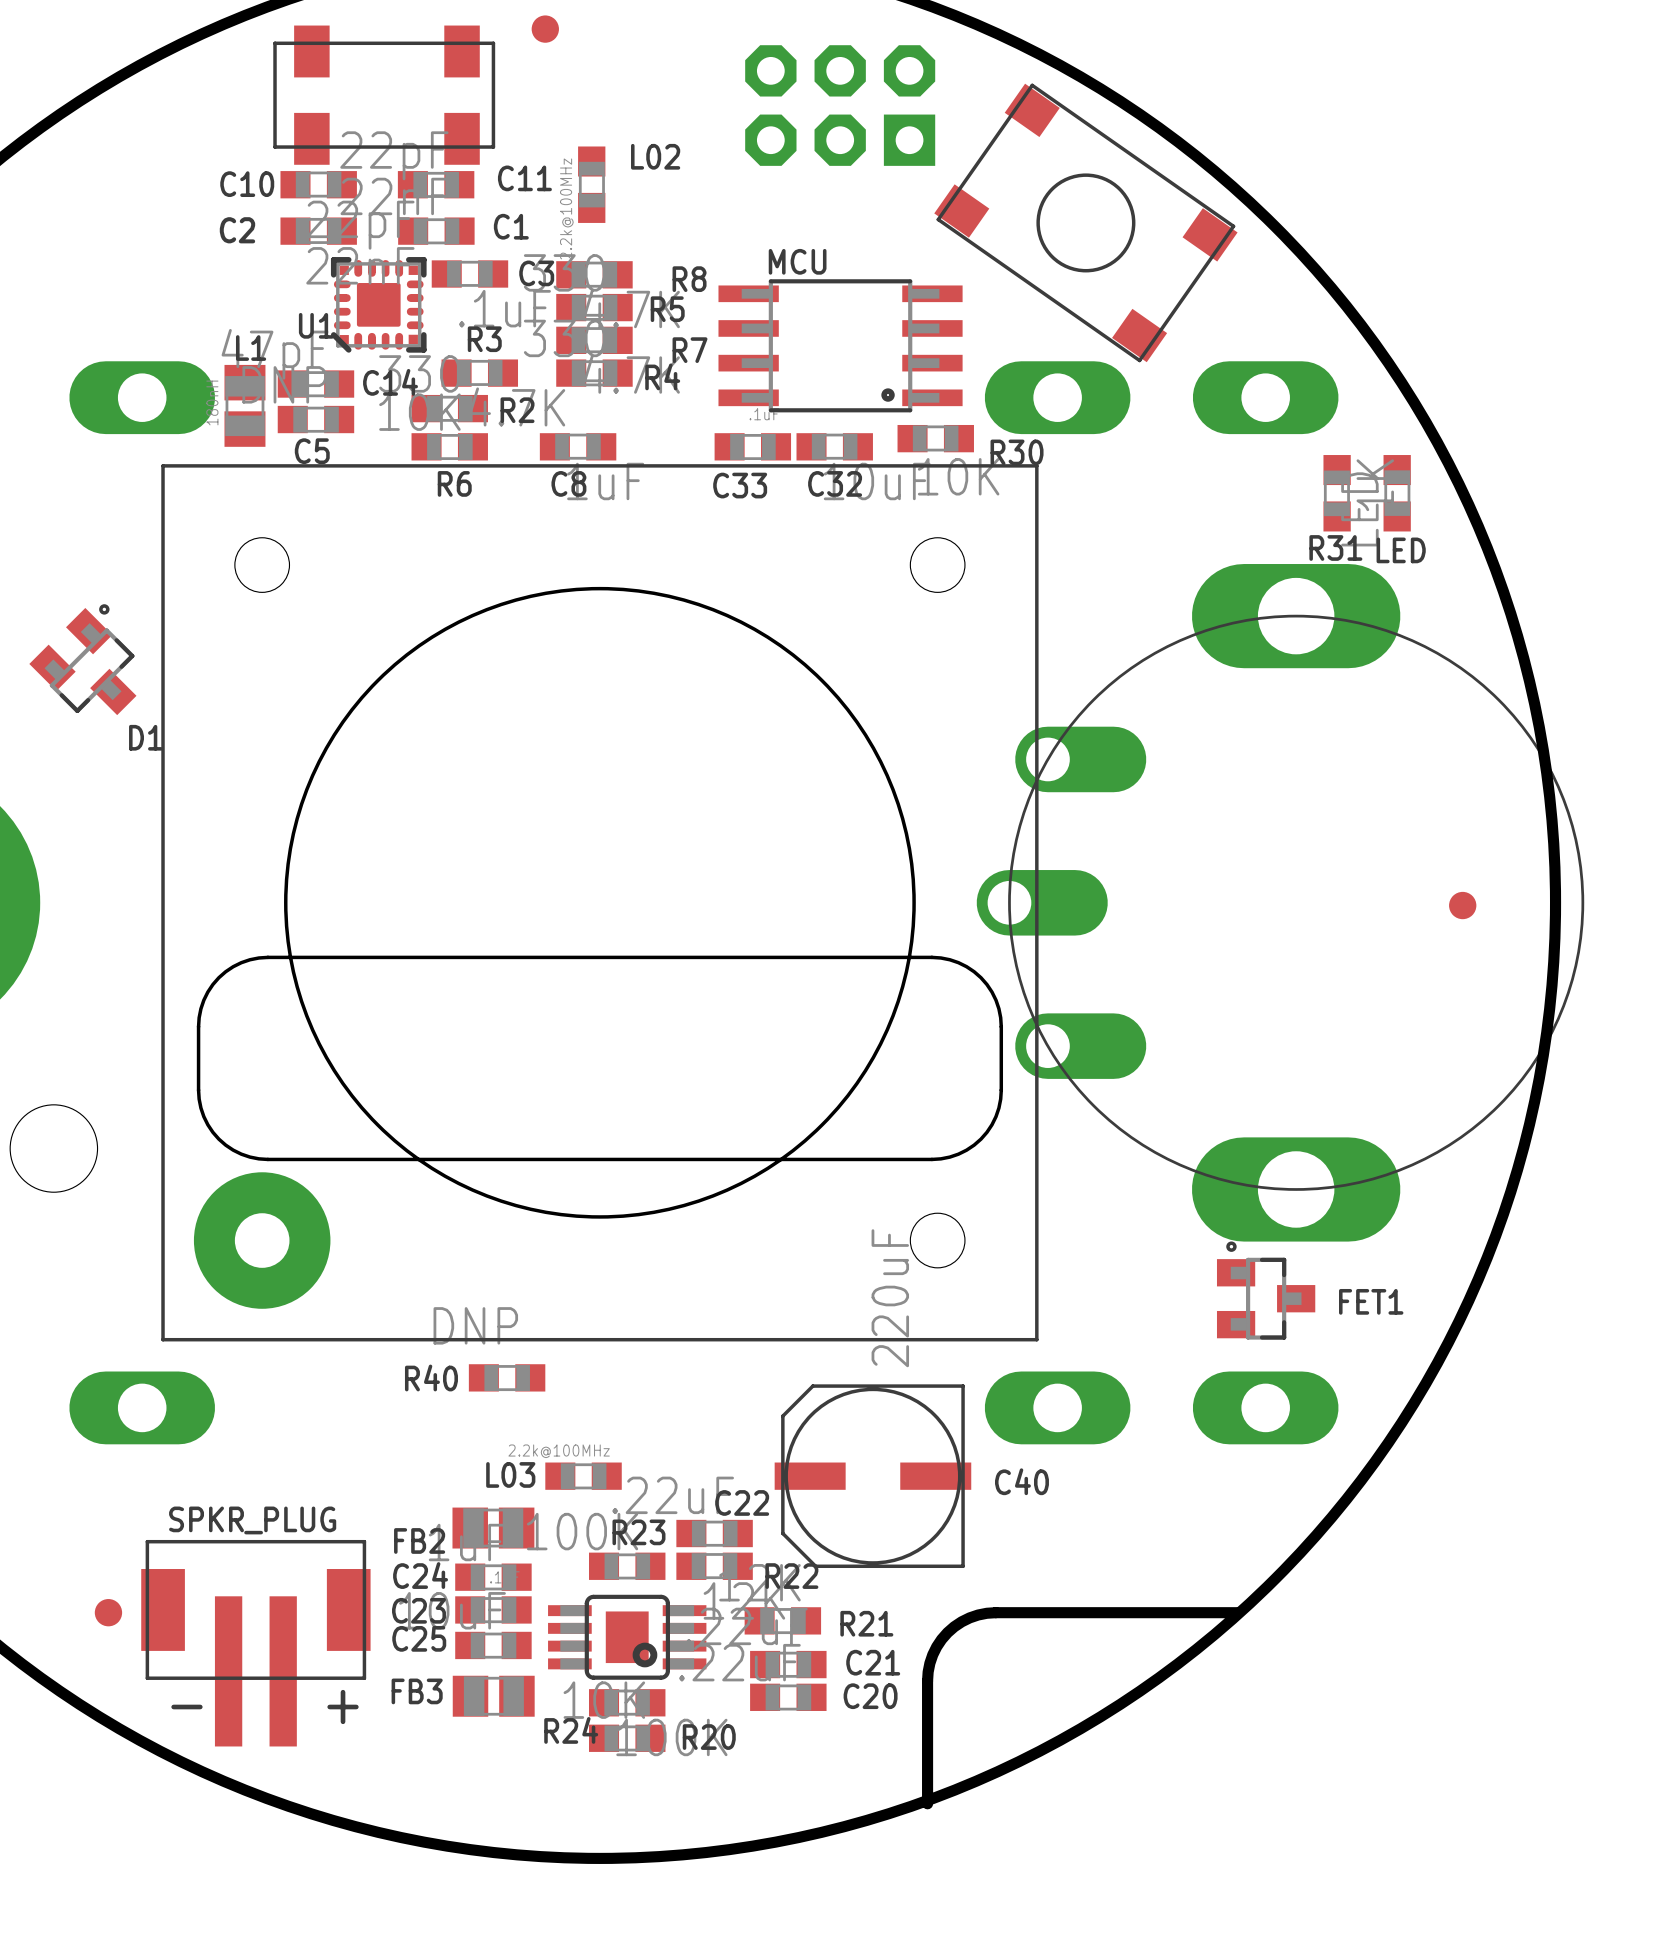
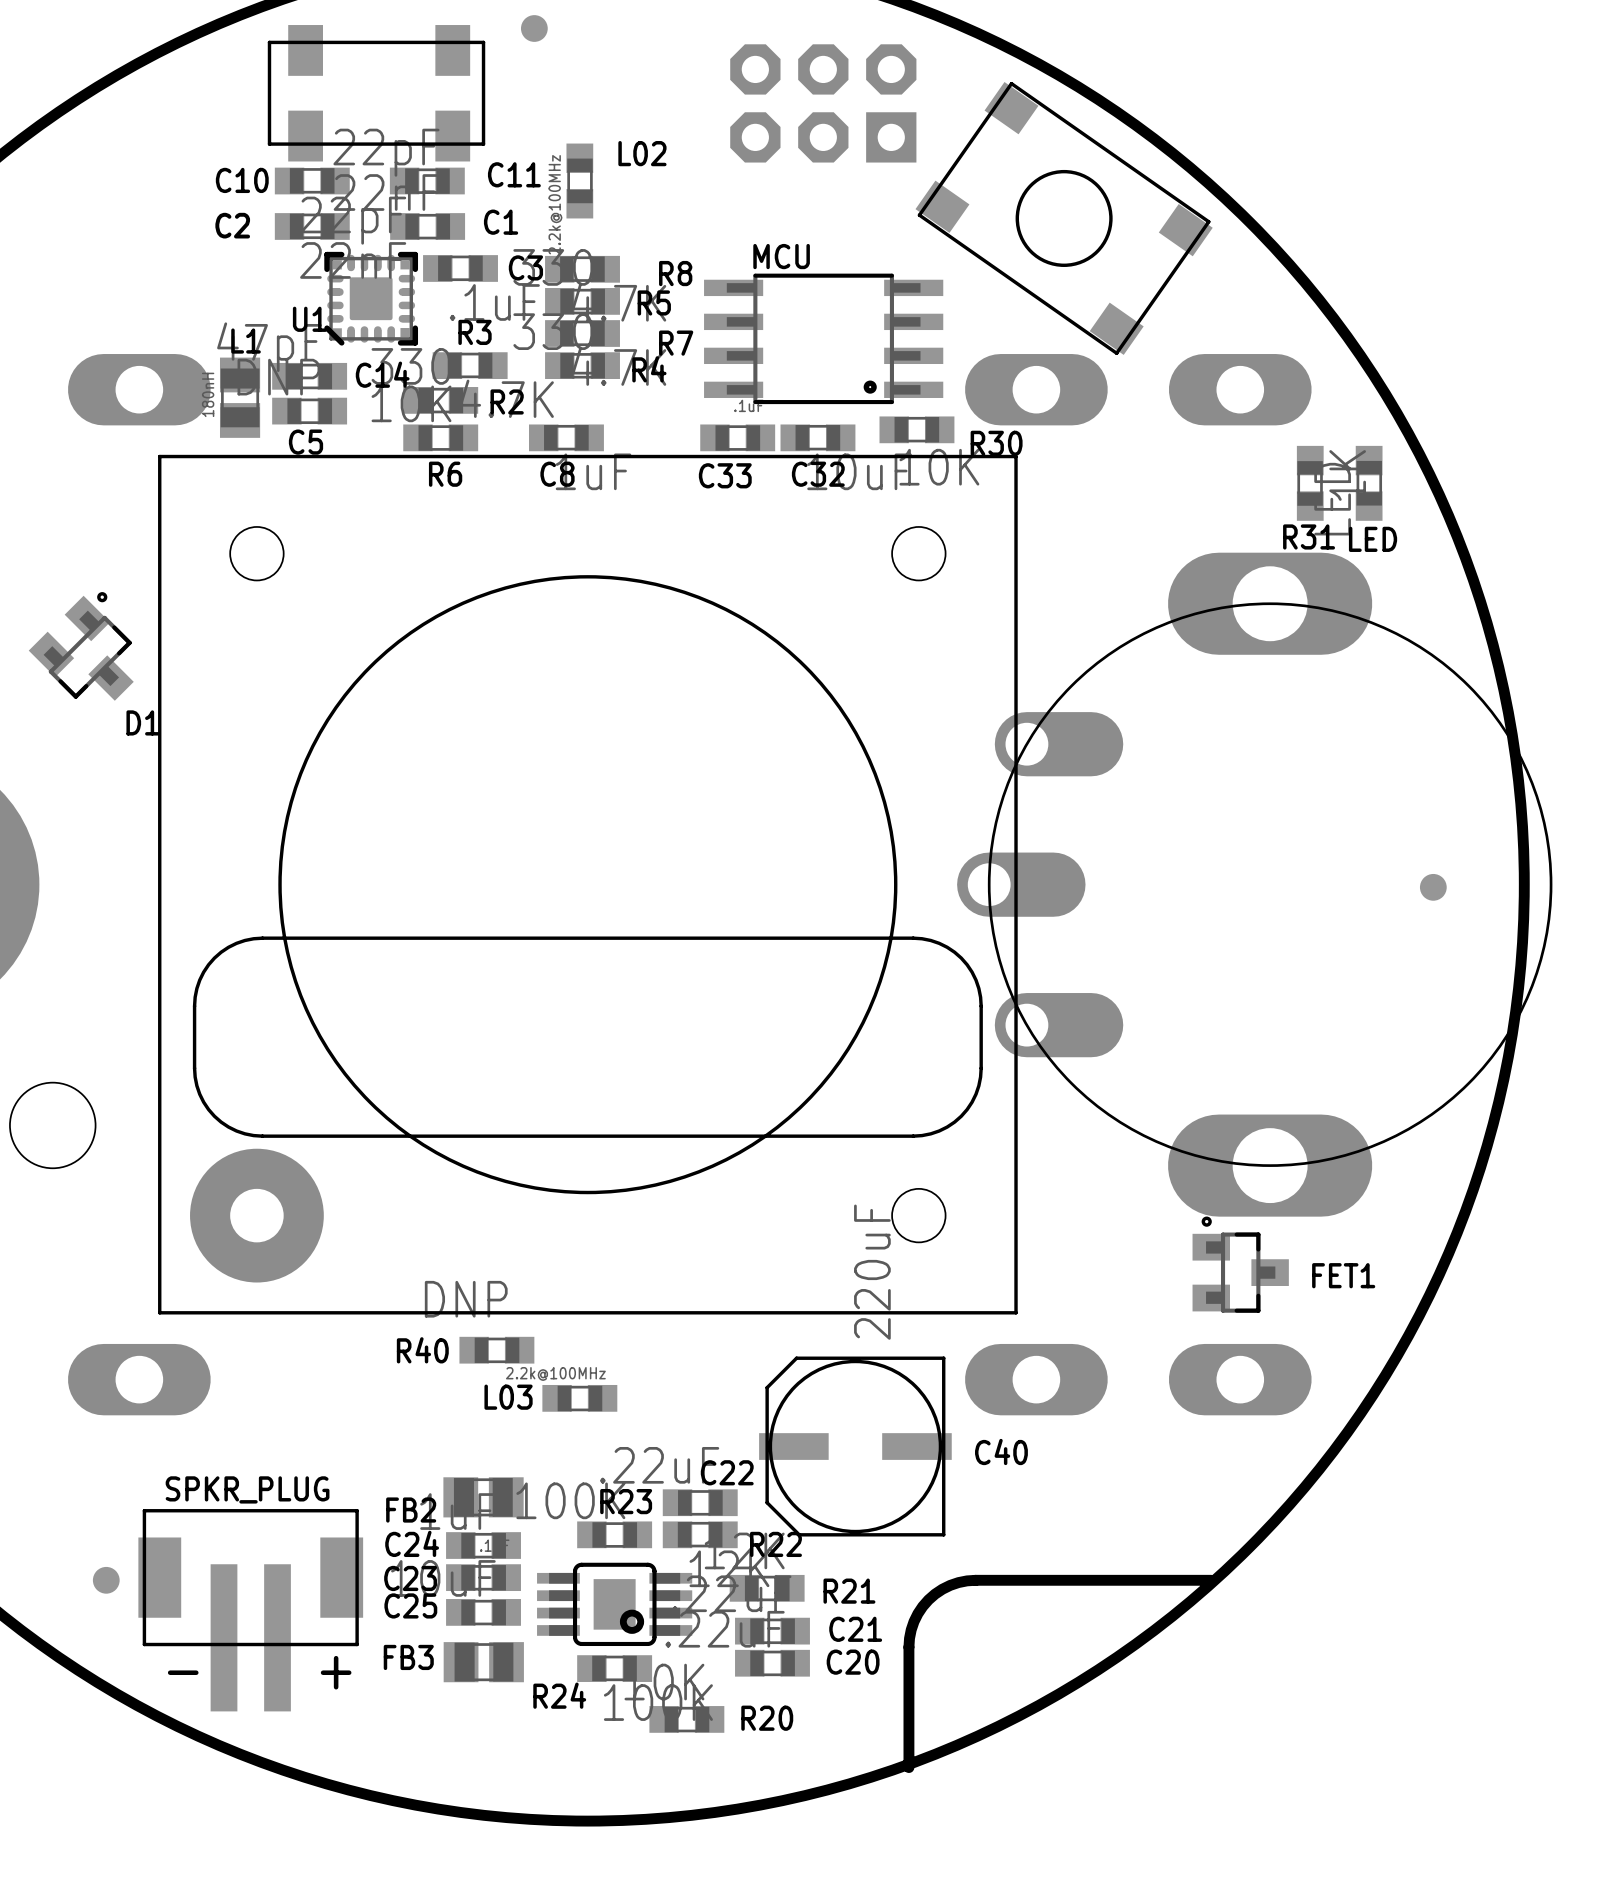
L03 position: (583, 1476) -> (579, 1398)
R20 position: (627, 1738) -> (686, 1719)

